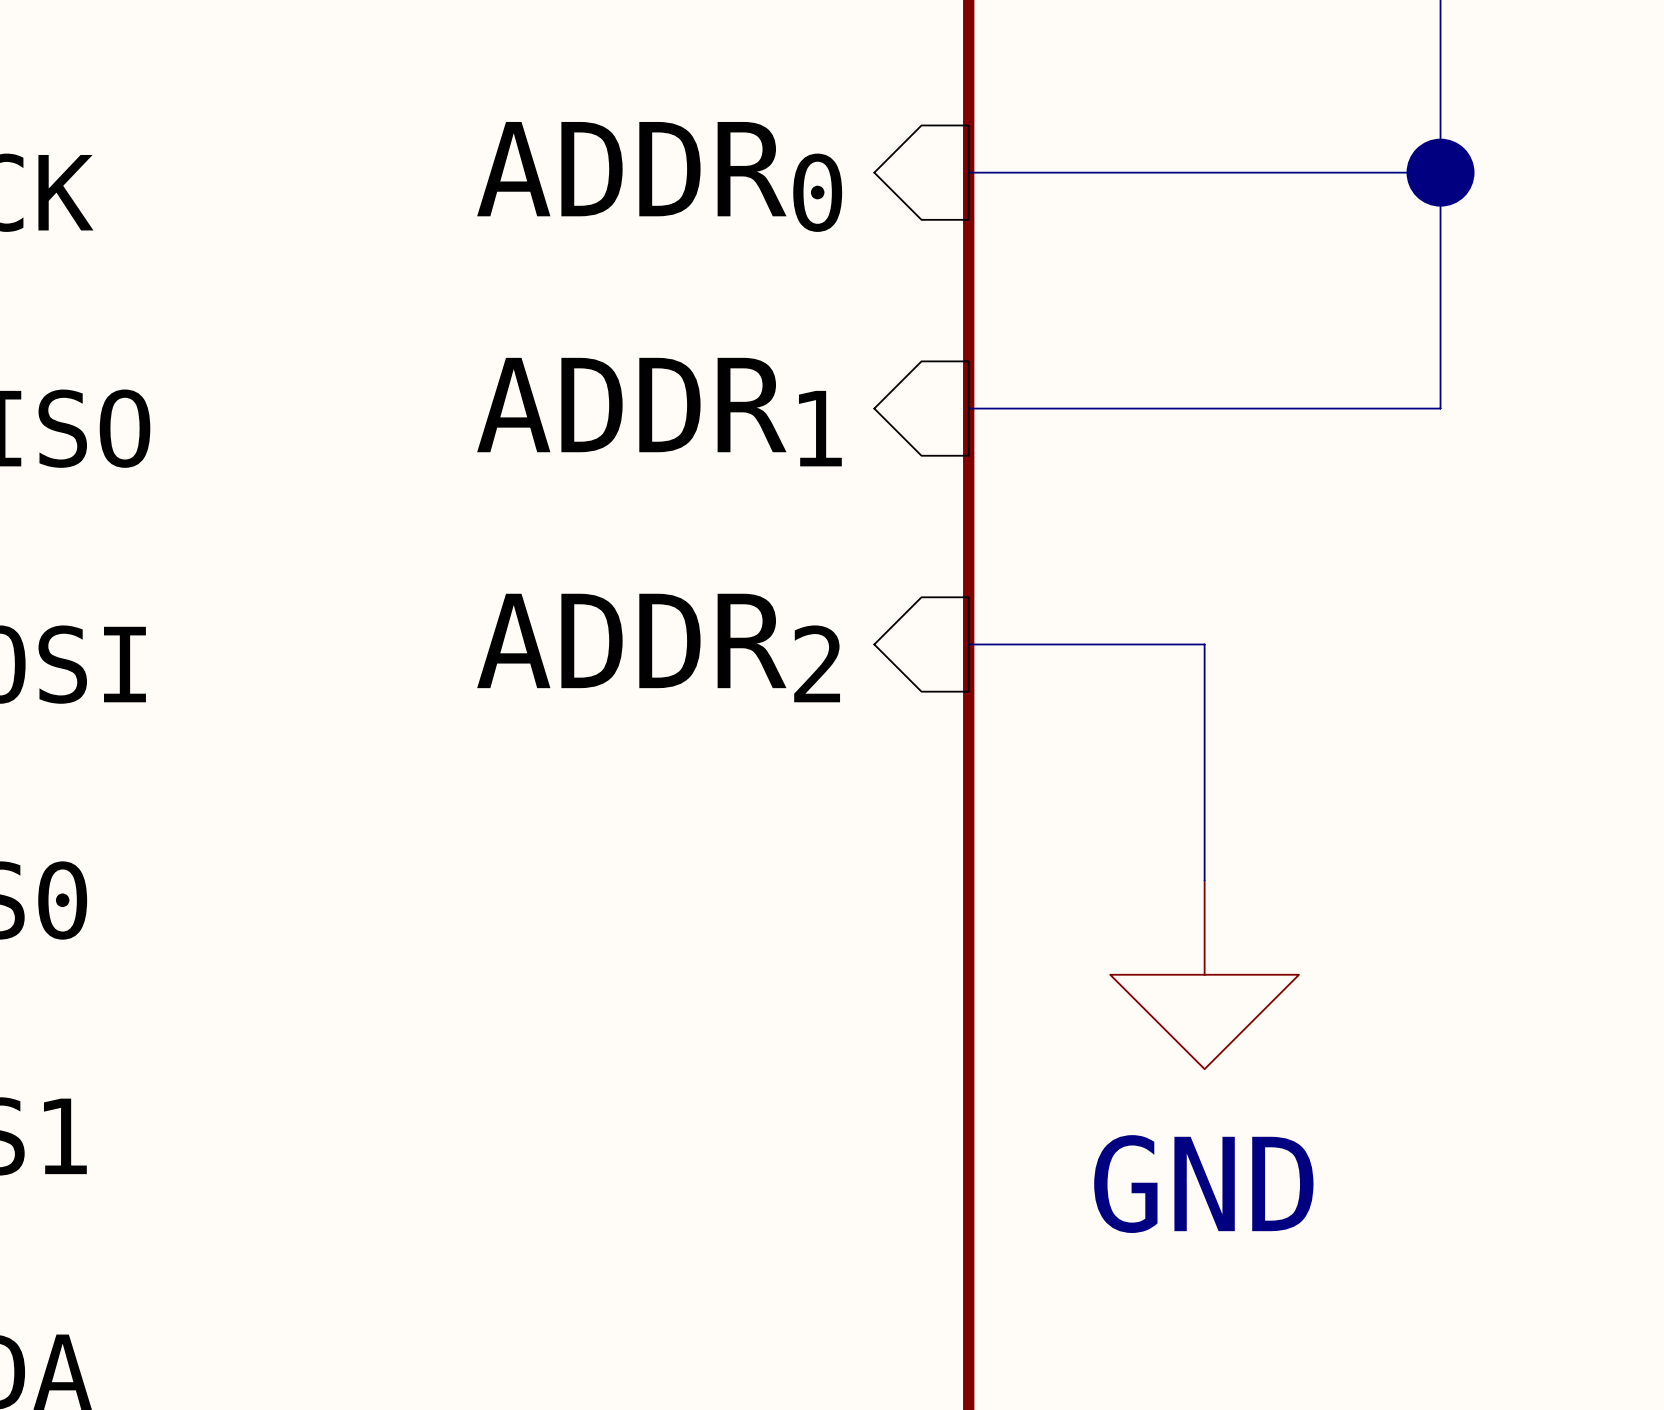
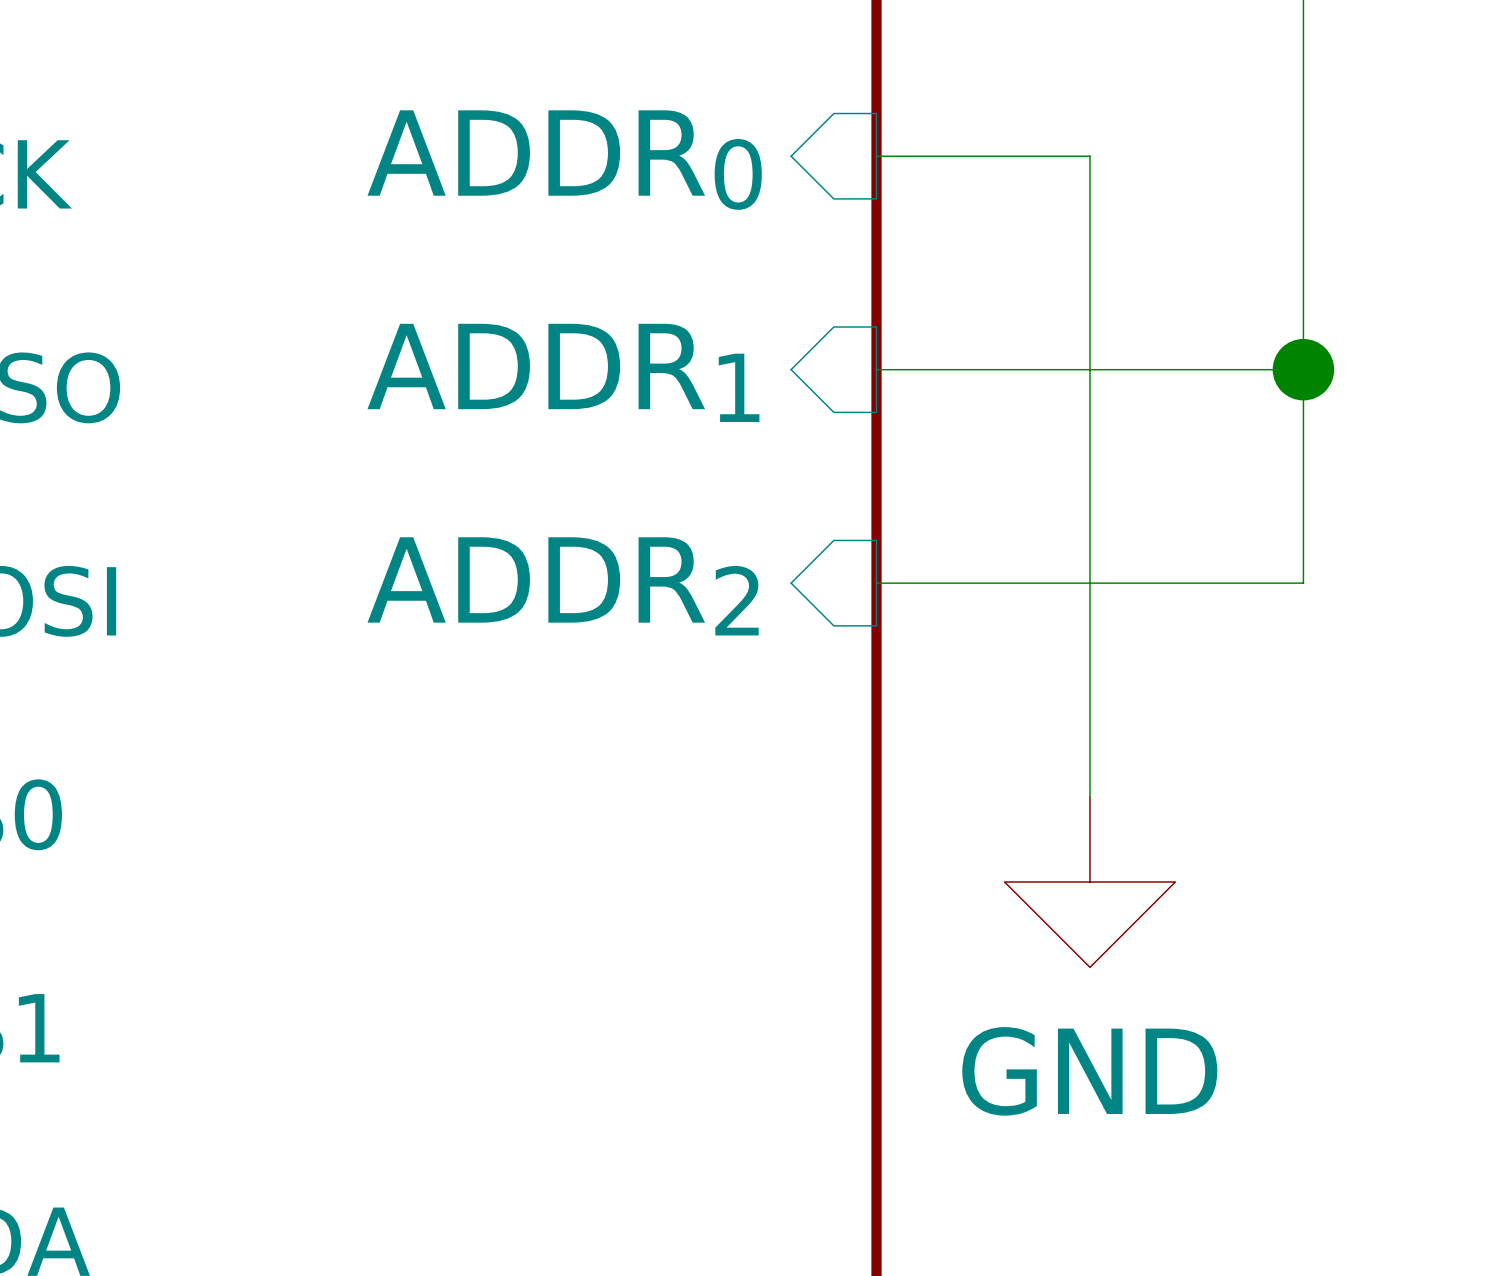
wire: (1204, 172) (1440, 172) -> (1089, 156) (1089, 583) (1303, 583) (1303, 369)
junction position: (1440, 172) -> (1303, 369)

